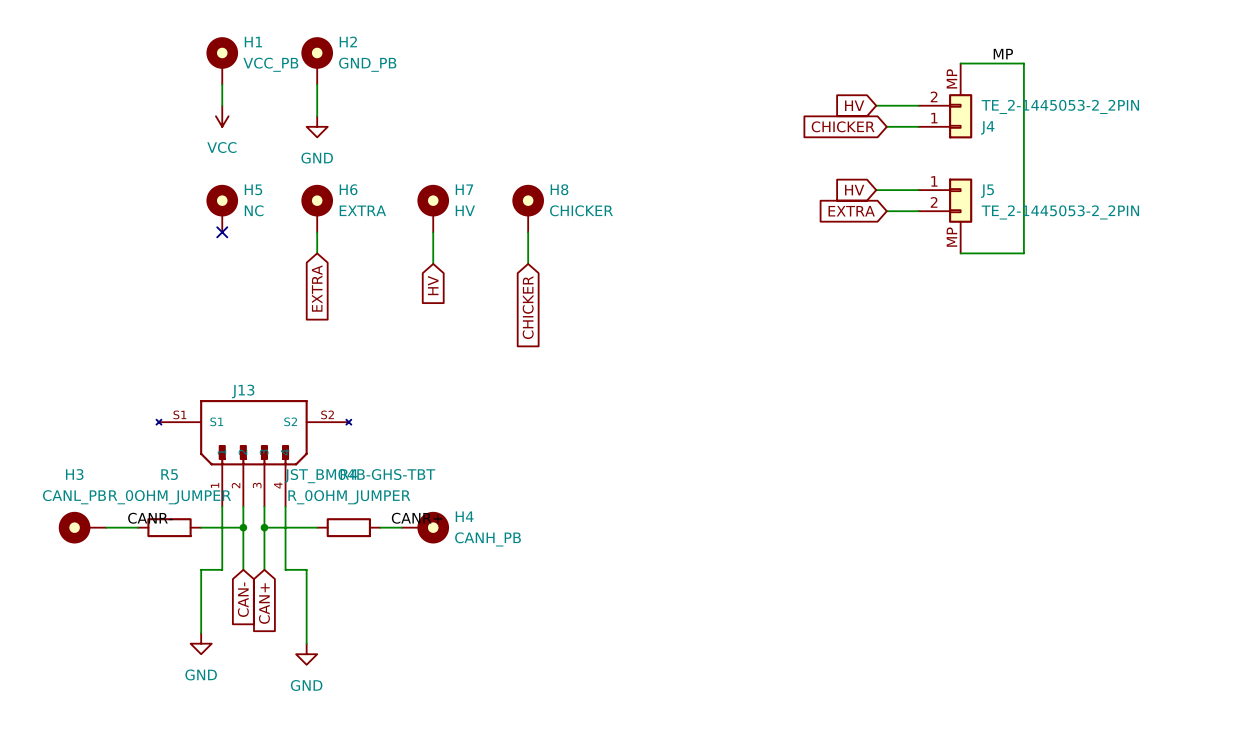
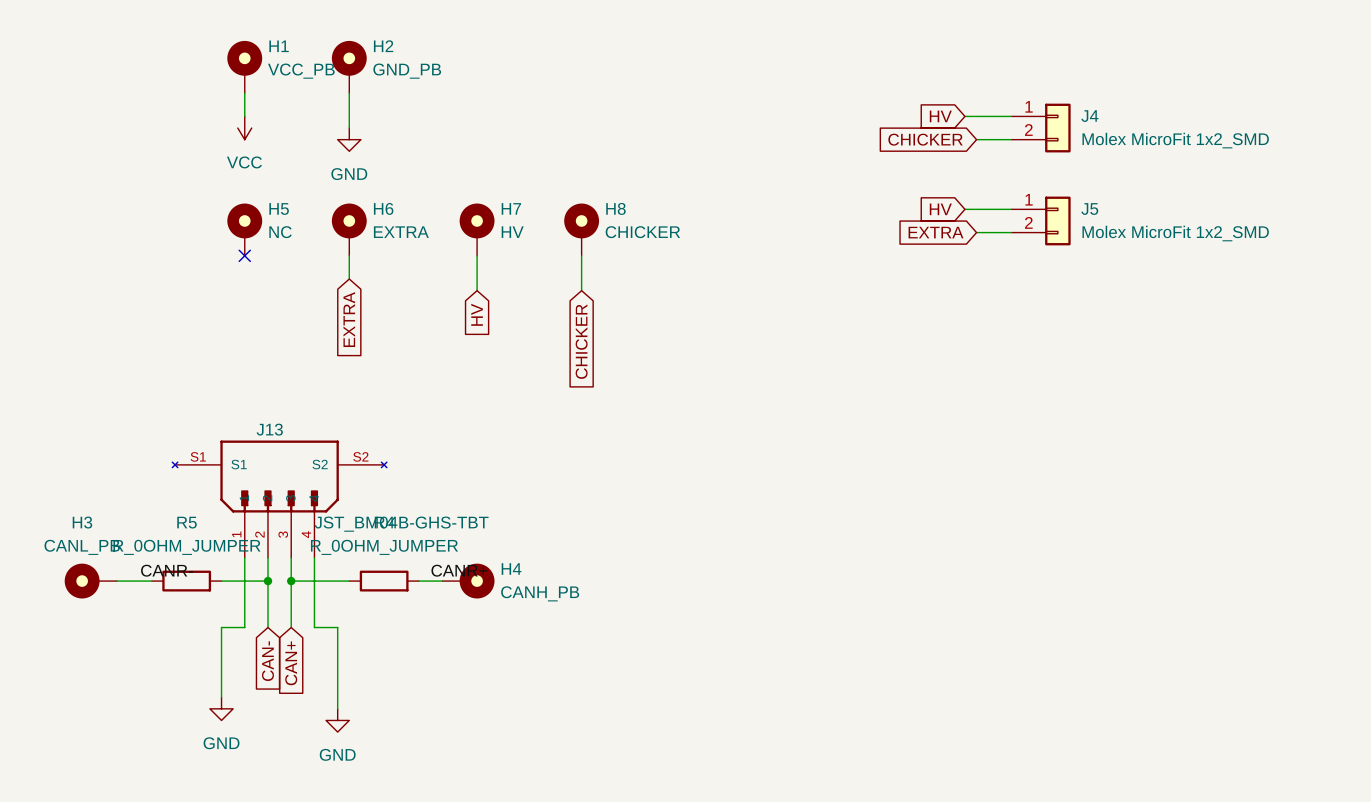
label: MP (1003, 54) -> none
J4 symbol: [918, 63, 973, 139] -> [1011, 103, 1071, 153]
wire: (960, 63) (1023, 63) (1023, 253) (960, 253) -> none
J4 value: TE_2-1445053-2_2PIN (1060, 106) -> Molex MicroFit 1x2_SMD (1175, 140)
J4 name position: J4 (987, 127) -> J4 (1089, 116)
J5 symbol: [918, 178, 973, 254] -> [1011, 196, 1071, 246]
J5 value: TE_2-1445053-2_2PIN (1060, 212) -> Molex MicroFit 1x2_SMD (1175, 233)

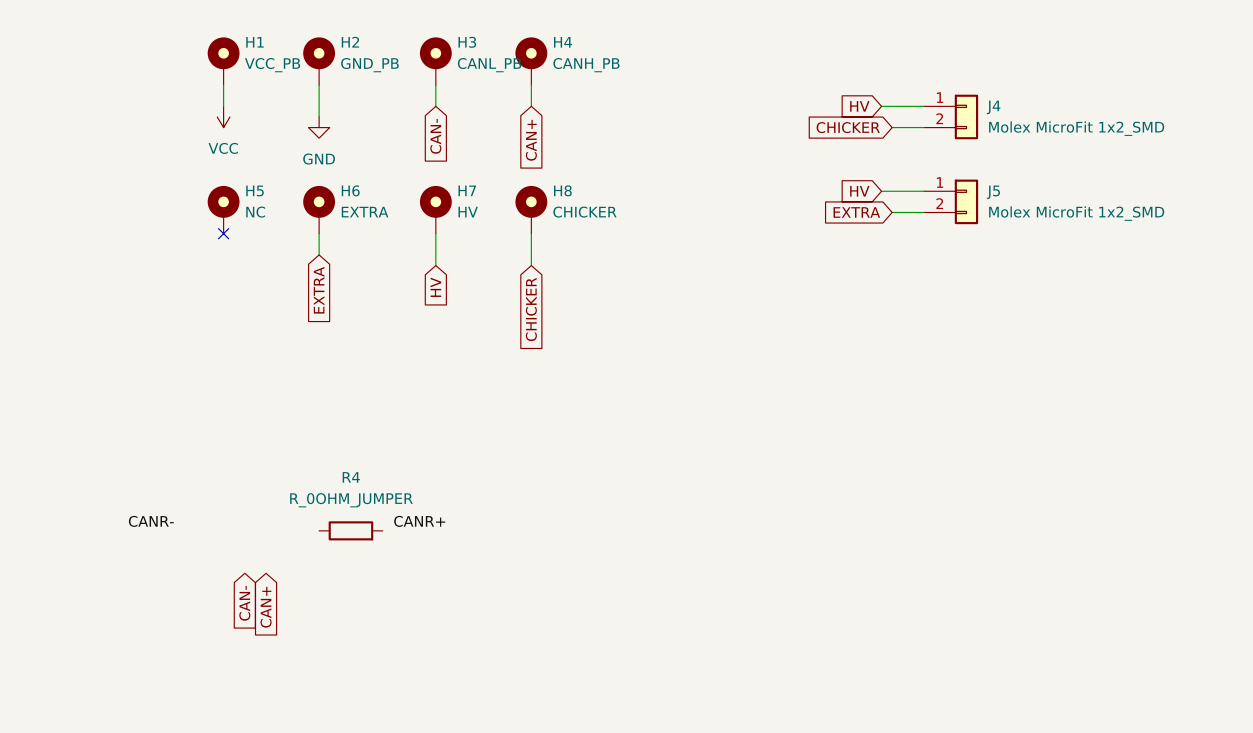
wire: none -> (435, 85) (435, 106)
wire: none -> (531, 85) (531, 106)
global label: none -> CAN- (435, 136)
global label: none -> CAN+ (531, 140)
J13: JST_BM04B-GHS-TBT (279, 499) -> none
H3 name position: H3 (82, 522) -> H3 (467, 42)
H3 value position: CANL_PB (82, 547) -> CANL_PB (489, 65)
wire: (244, 557) (244, 627) (221, 627) (221, 697) -> none
wire: (267, 557) (267, 627) -> none
wire: (291, 557) (291, 627) -> none
wire: (314, 557) (314, 627) (337, 627) (337, 708) -> none
H3 rotation: 0° (82, 581) -> 90° clockwise (435, 53)
H3 position: (90, 581) -> (435, 61)
wire: (116, 581) (151, 581) -> none
R5: R_0OHM_JUMPER (186, 581) -> none
wire: (221, 581) (267, 581) -> none
junction: (267, 581) -> none
wire: (291, 581) (349, 581) -> none
junction: (291, 581) -> none
wire: (418, 581) (442, 581) -> none
H4 position: (468, 581) -> (531, 61)
H4 rotation: 0° (477, 581) -> 90° counterclockwise (531, 53)
power symbol: GND (221, 708) -> none
power symbol: GND (337, 720) -> none

